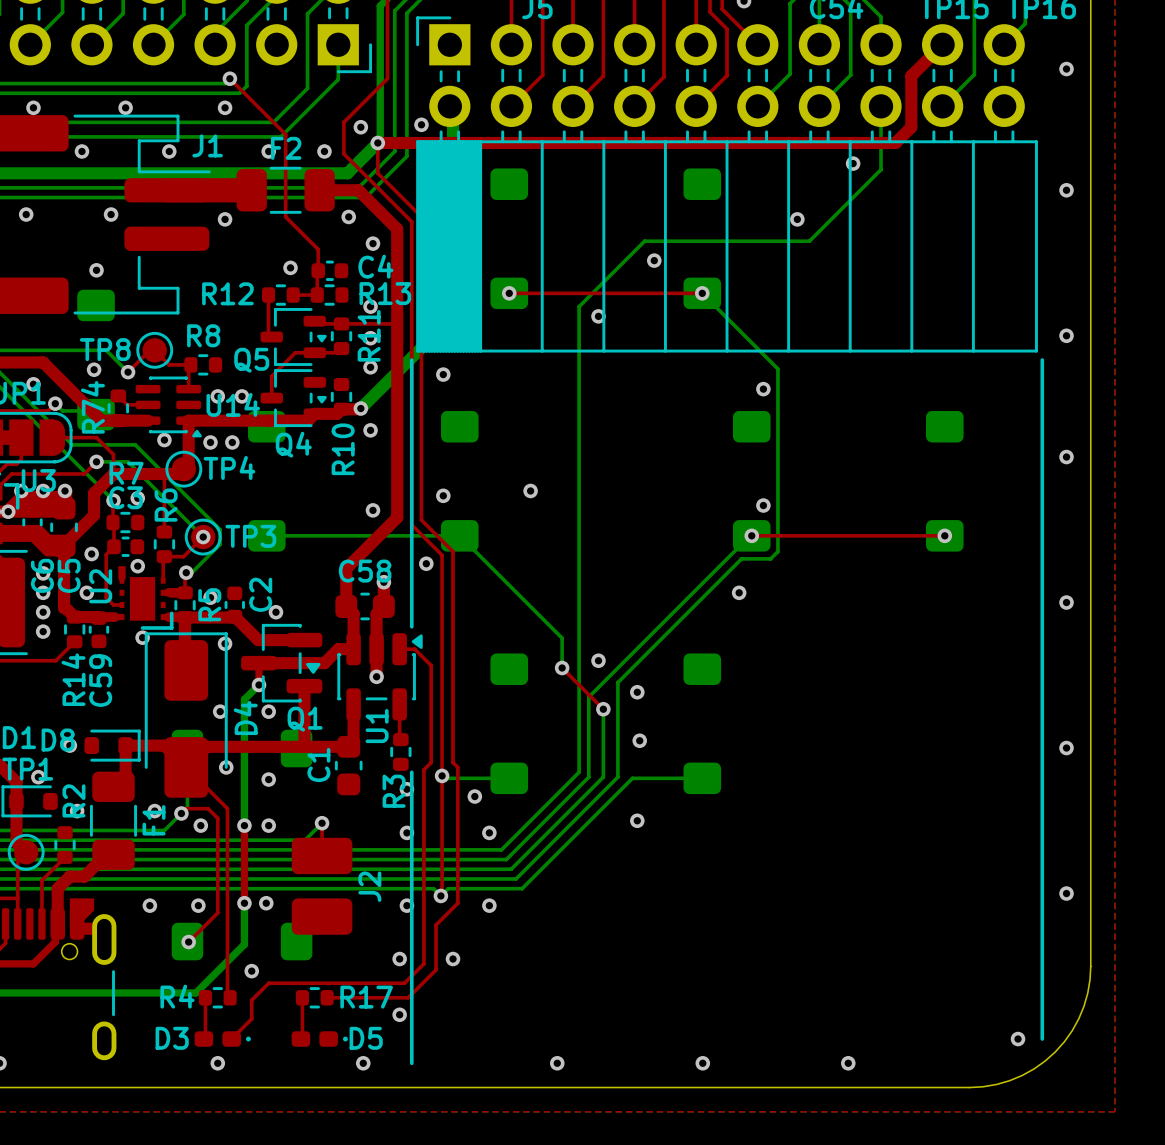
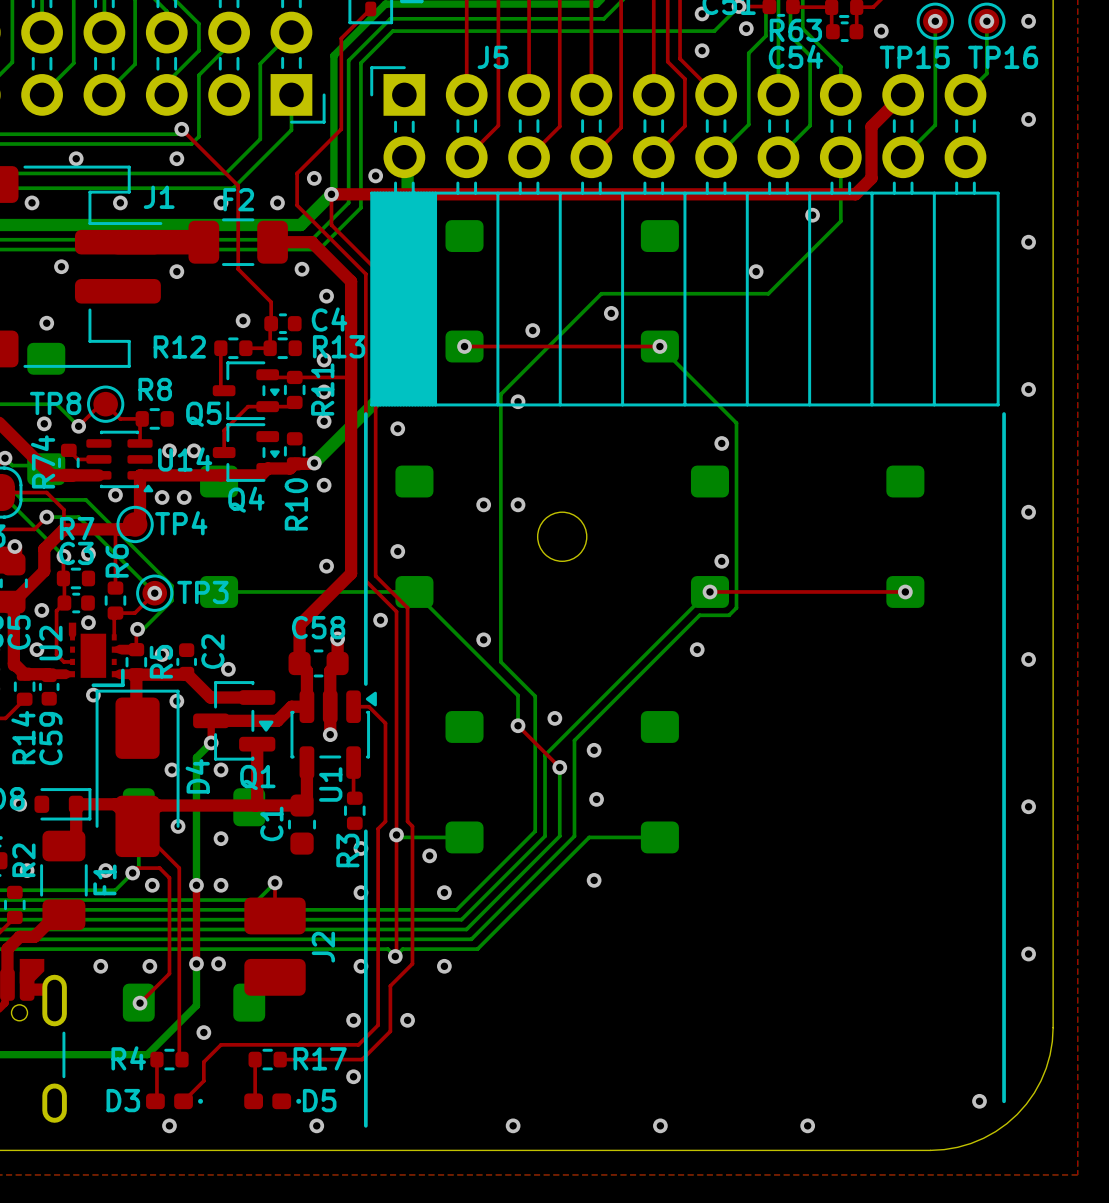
via: none -> (532, 330)
bottom track: (579, 306) (579, 638) -> (535, 360) (500, 394) (500, 661) (535, 696)
via: (598, 316) -> none
via: none -> (518, 401)
via: none -> (483, 504)
via: none -> (518, 504)
round board edge: none -> [537, 511, 588, 562]
via: (530, 490) -> none
via: none -> (483, 639)

